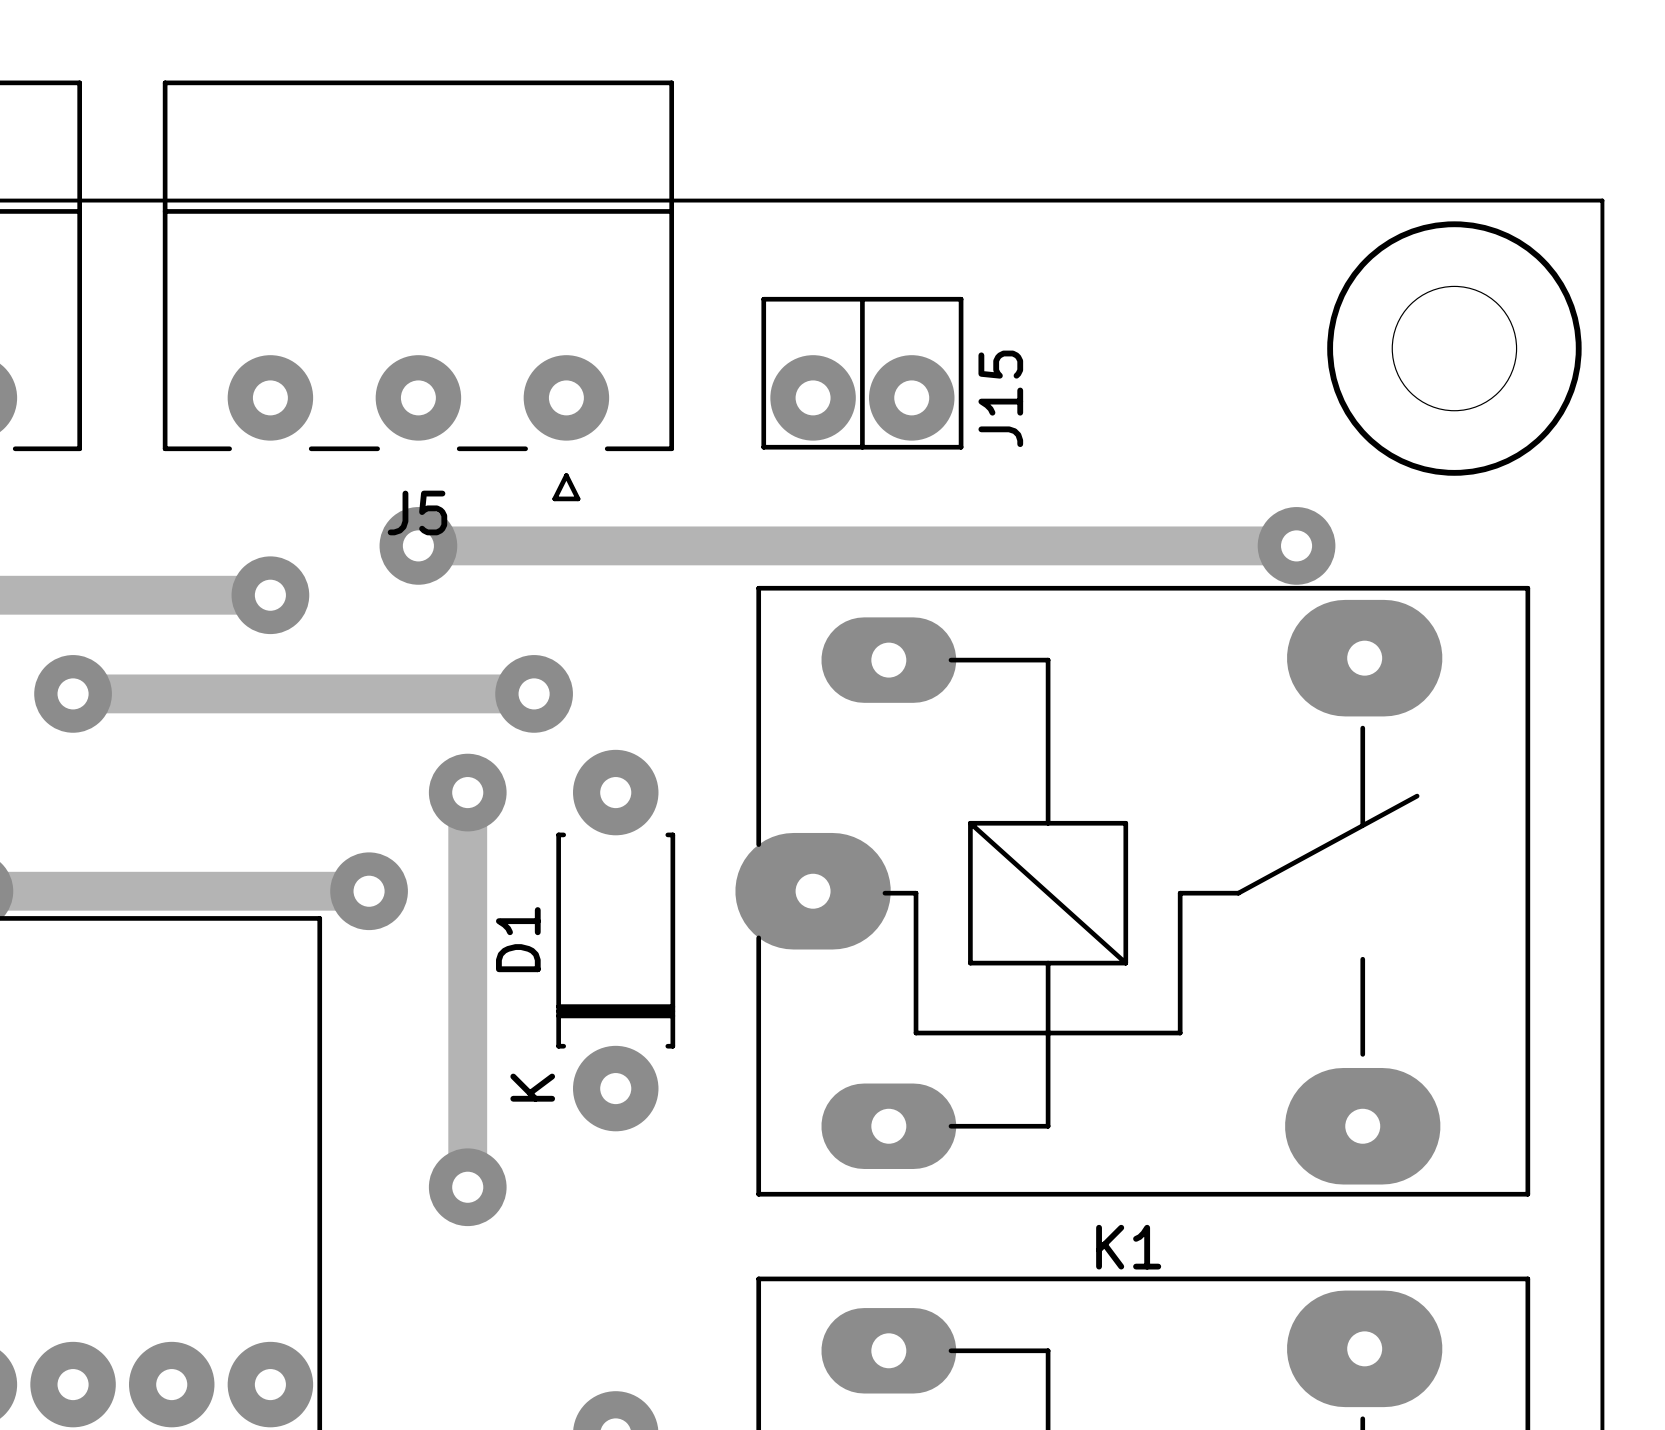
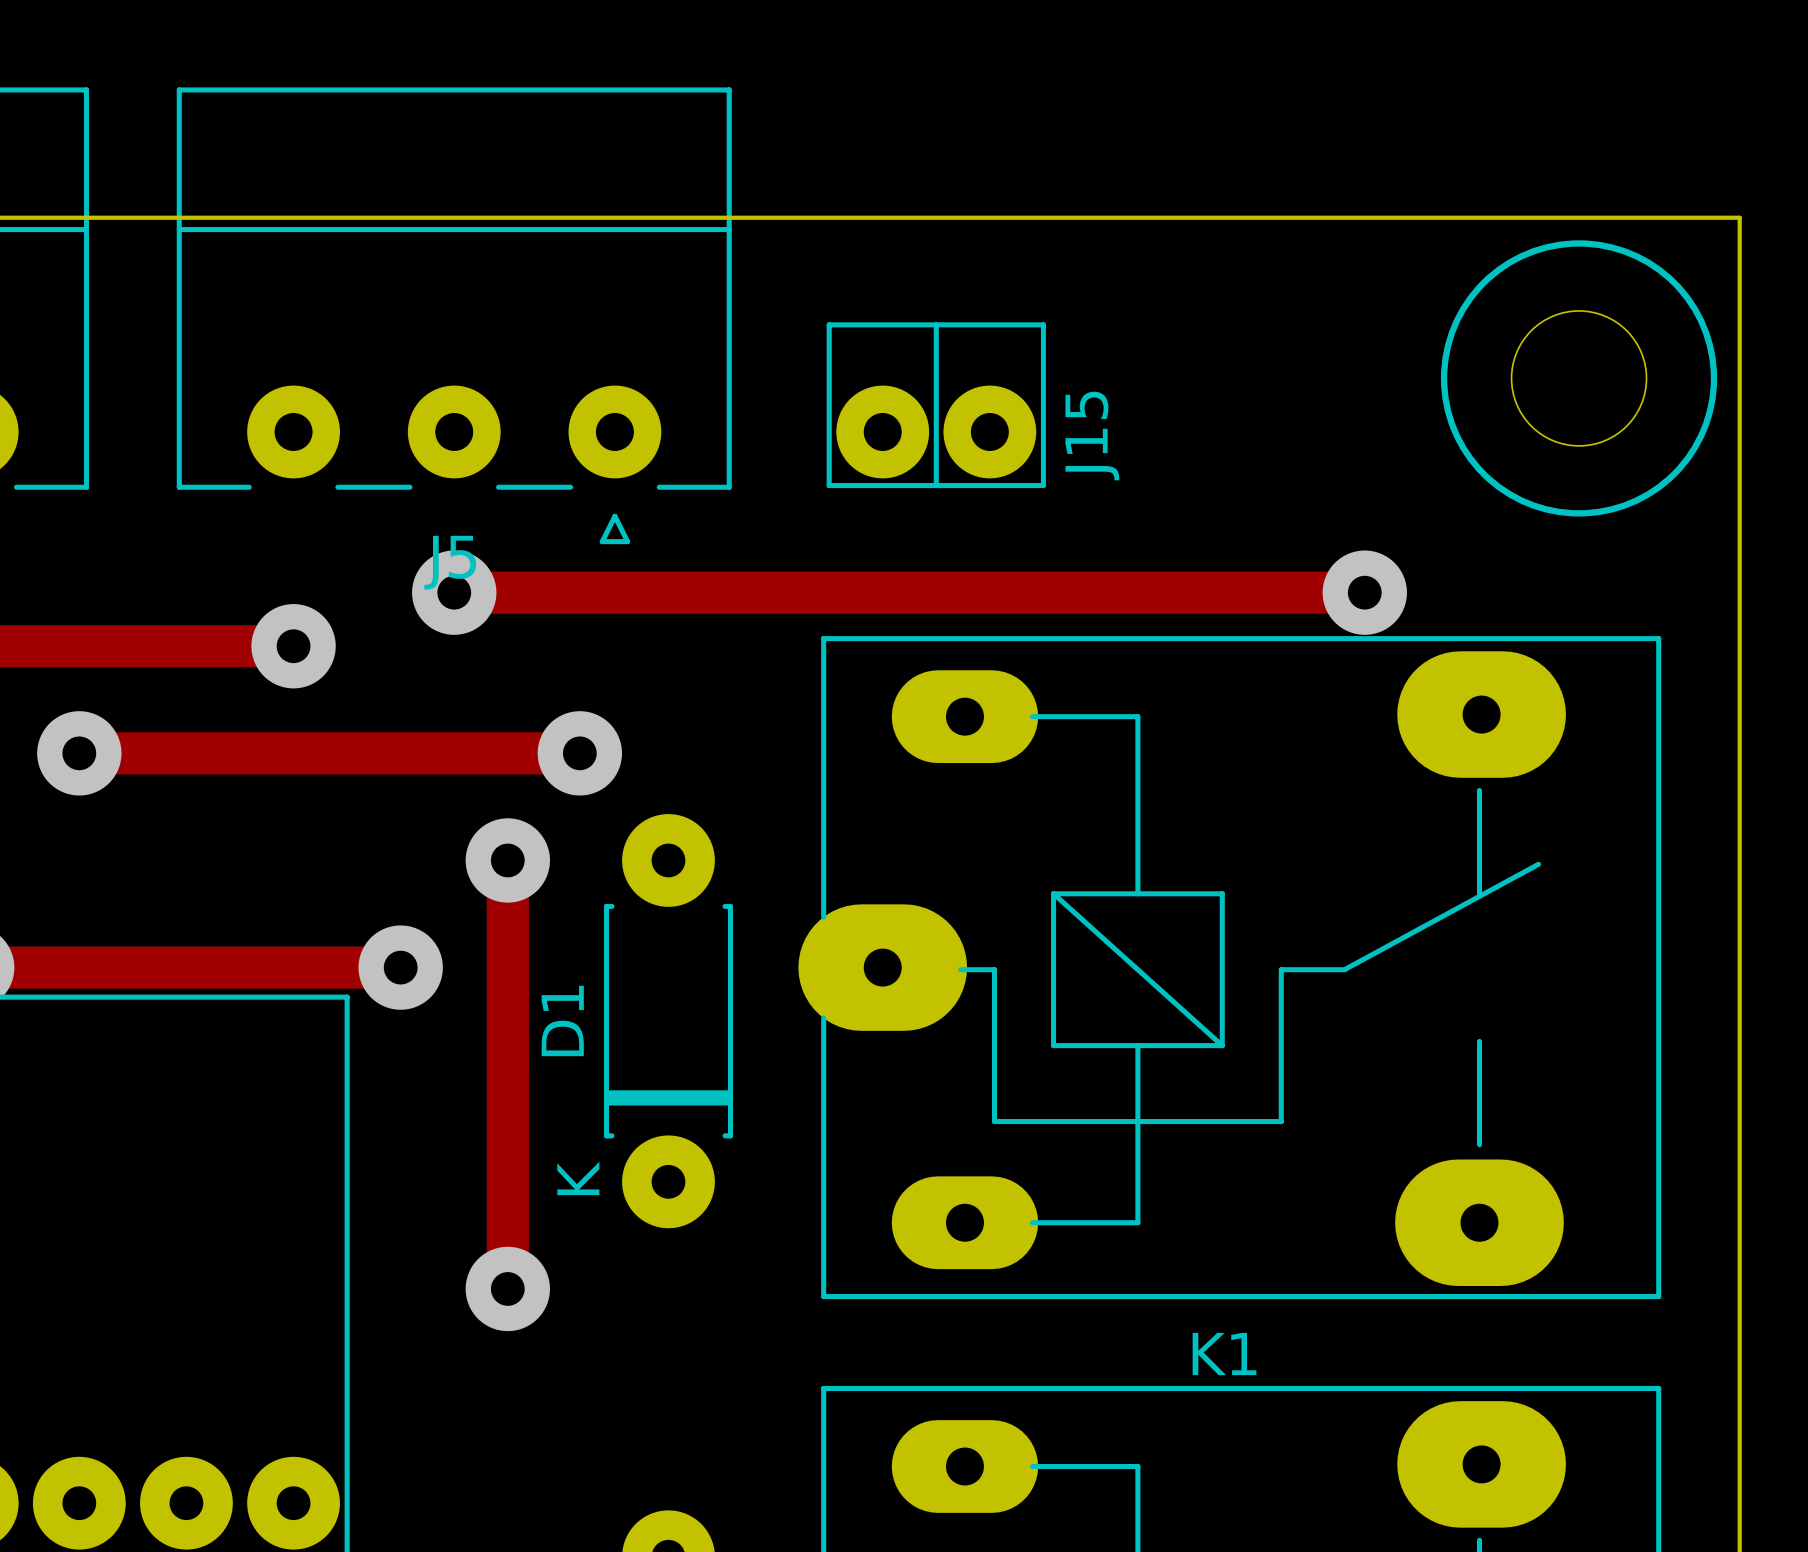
via position: (1296, 545) -> (1364, 592)

